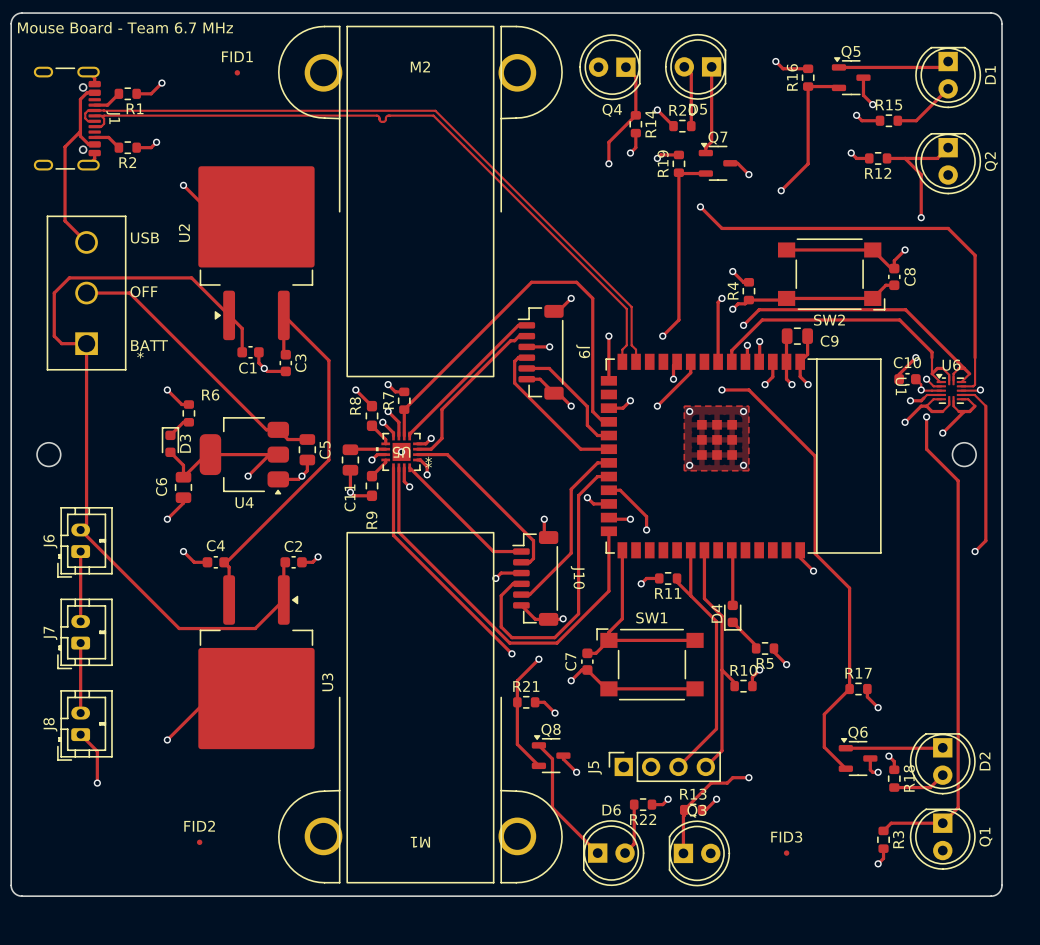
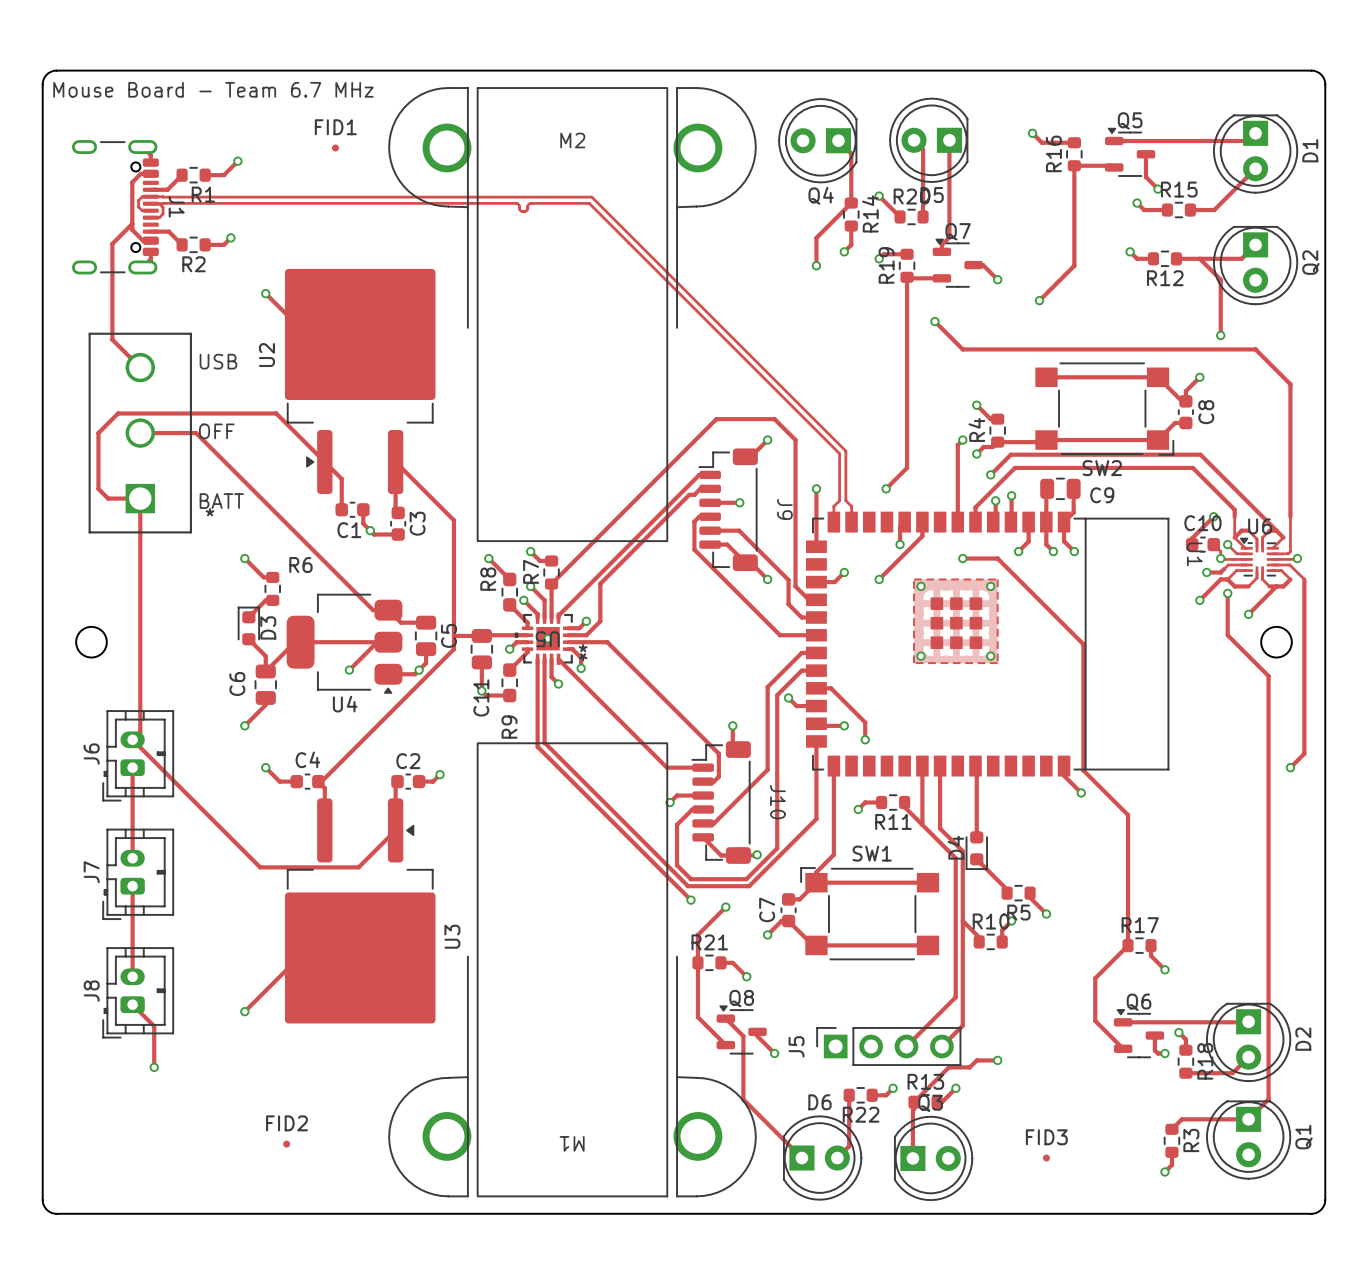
track: none -> (453, 635) (481, 635)

